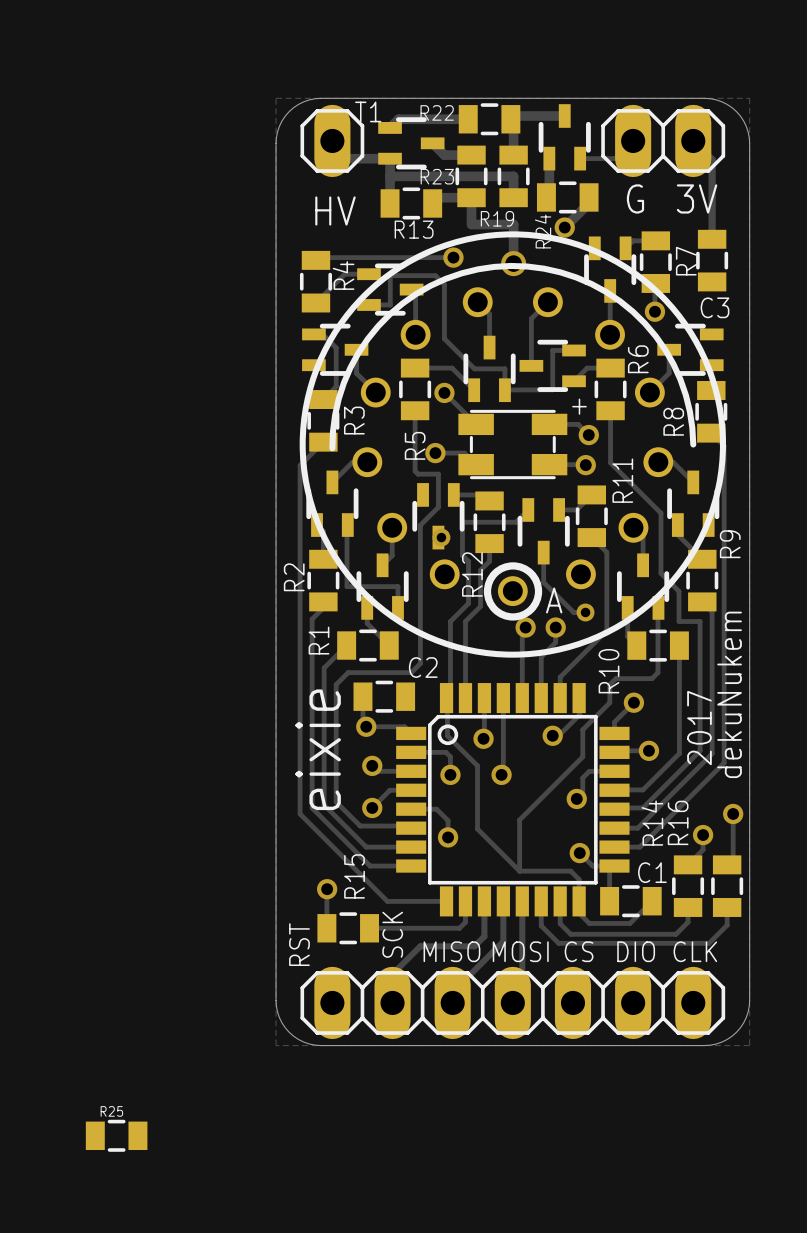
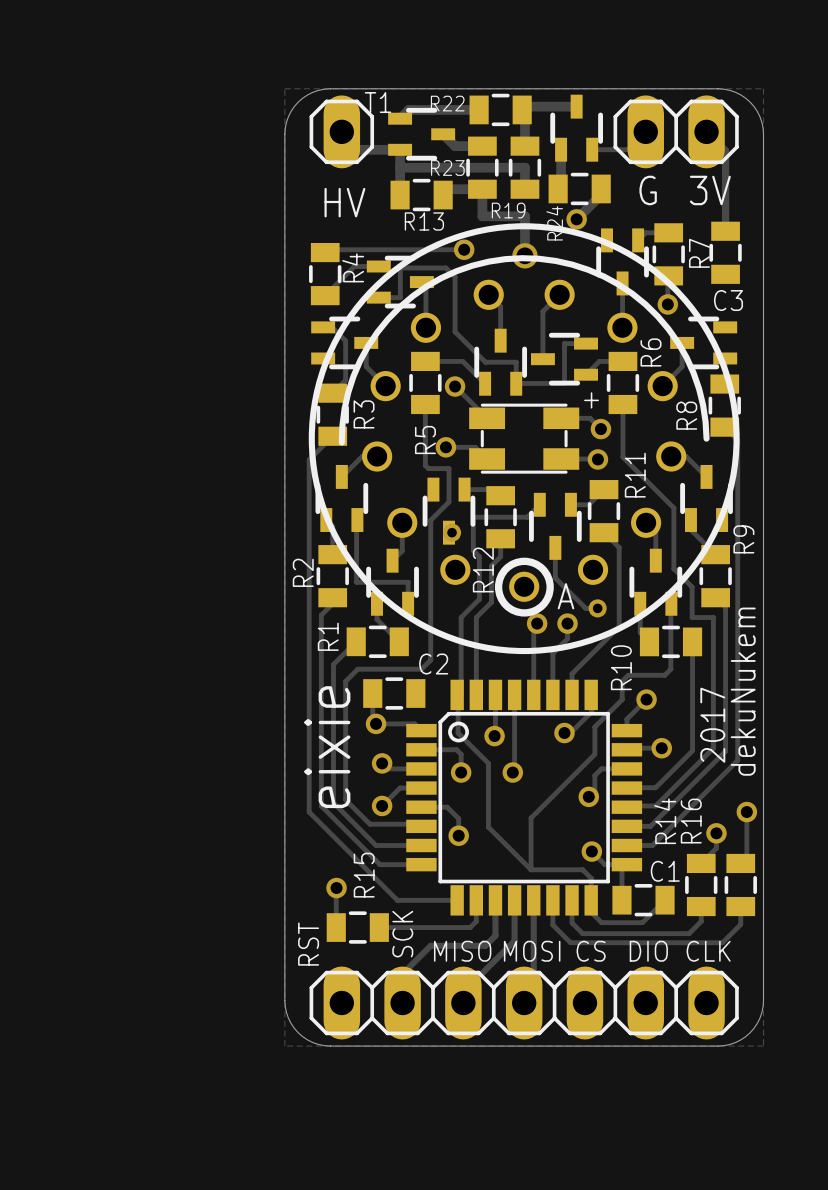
R25: (116, 1135) -> none

